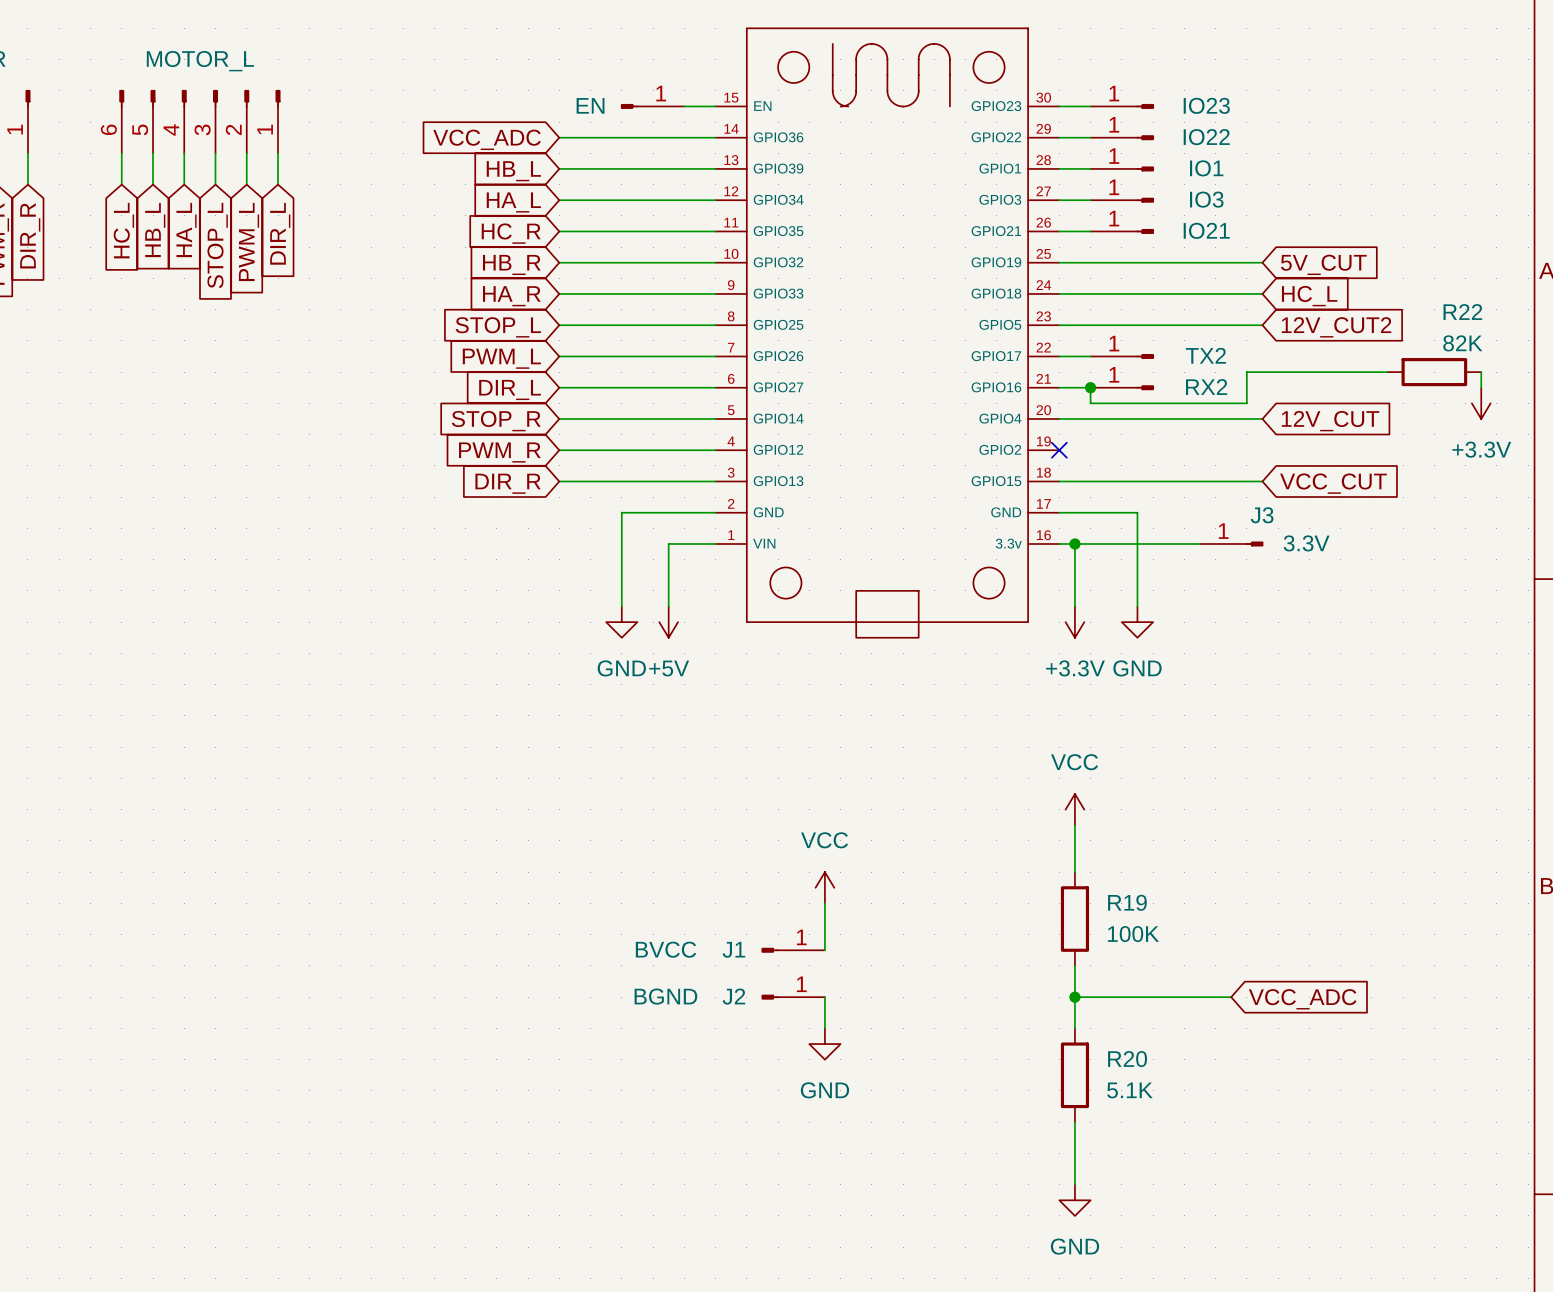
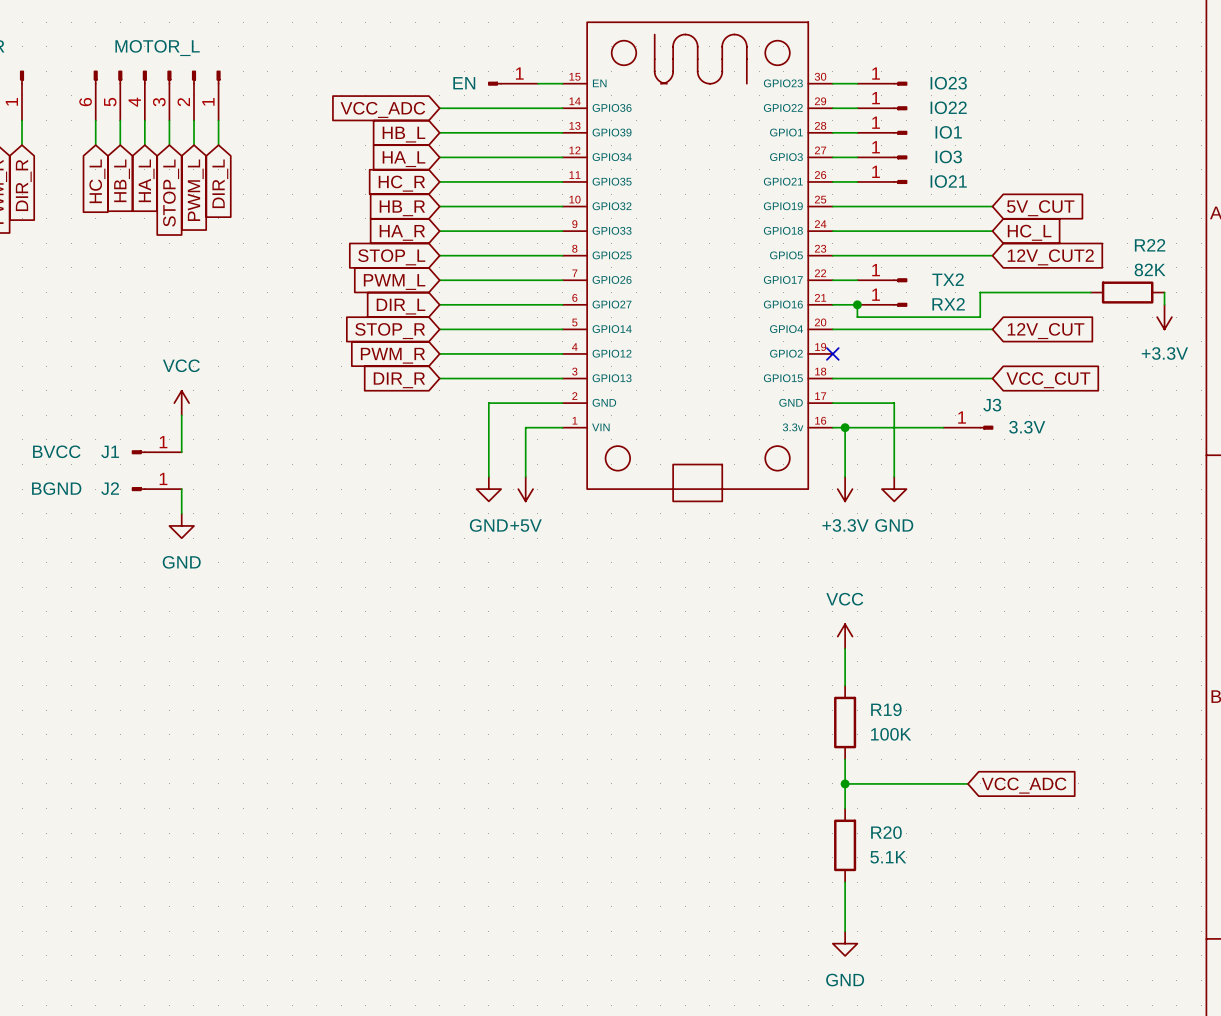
power symbol: none -> VCC (181, 403)
wire: none -> (181, 415) (181, 452)
wire: none -> (181, 489) (181, 513)
power symbol: none -> GND (181, 525)
power symbol: VCC (824, 887) -> none
wire: (824, 903) (824, 950) -> none
J1 position: (793, 950) -> (156, 452)
J2 position: (793, 997) -> (156, 489)
wire: (824, 997) (824, 1028) -> none
power symbol: GND (824, 1044) -> none

